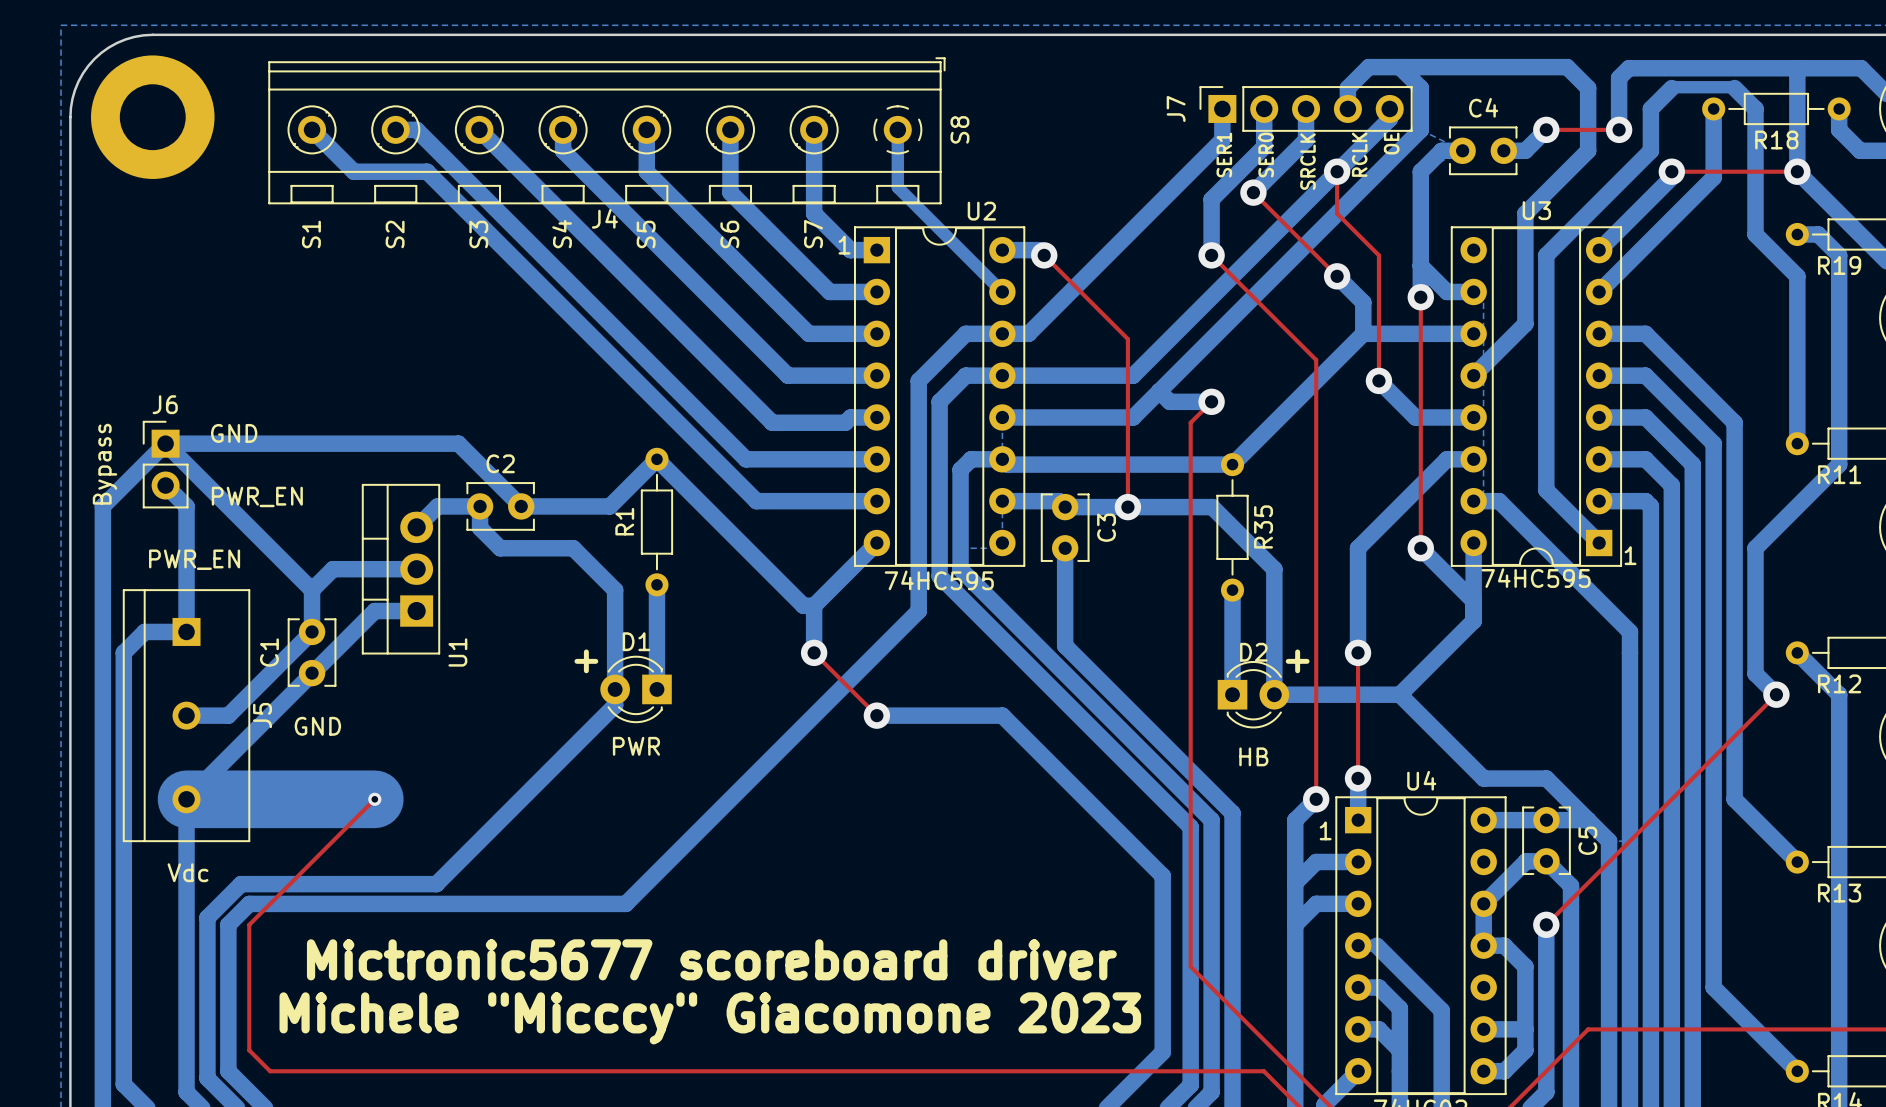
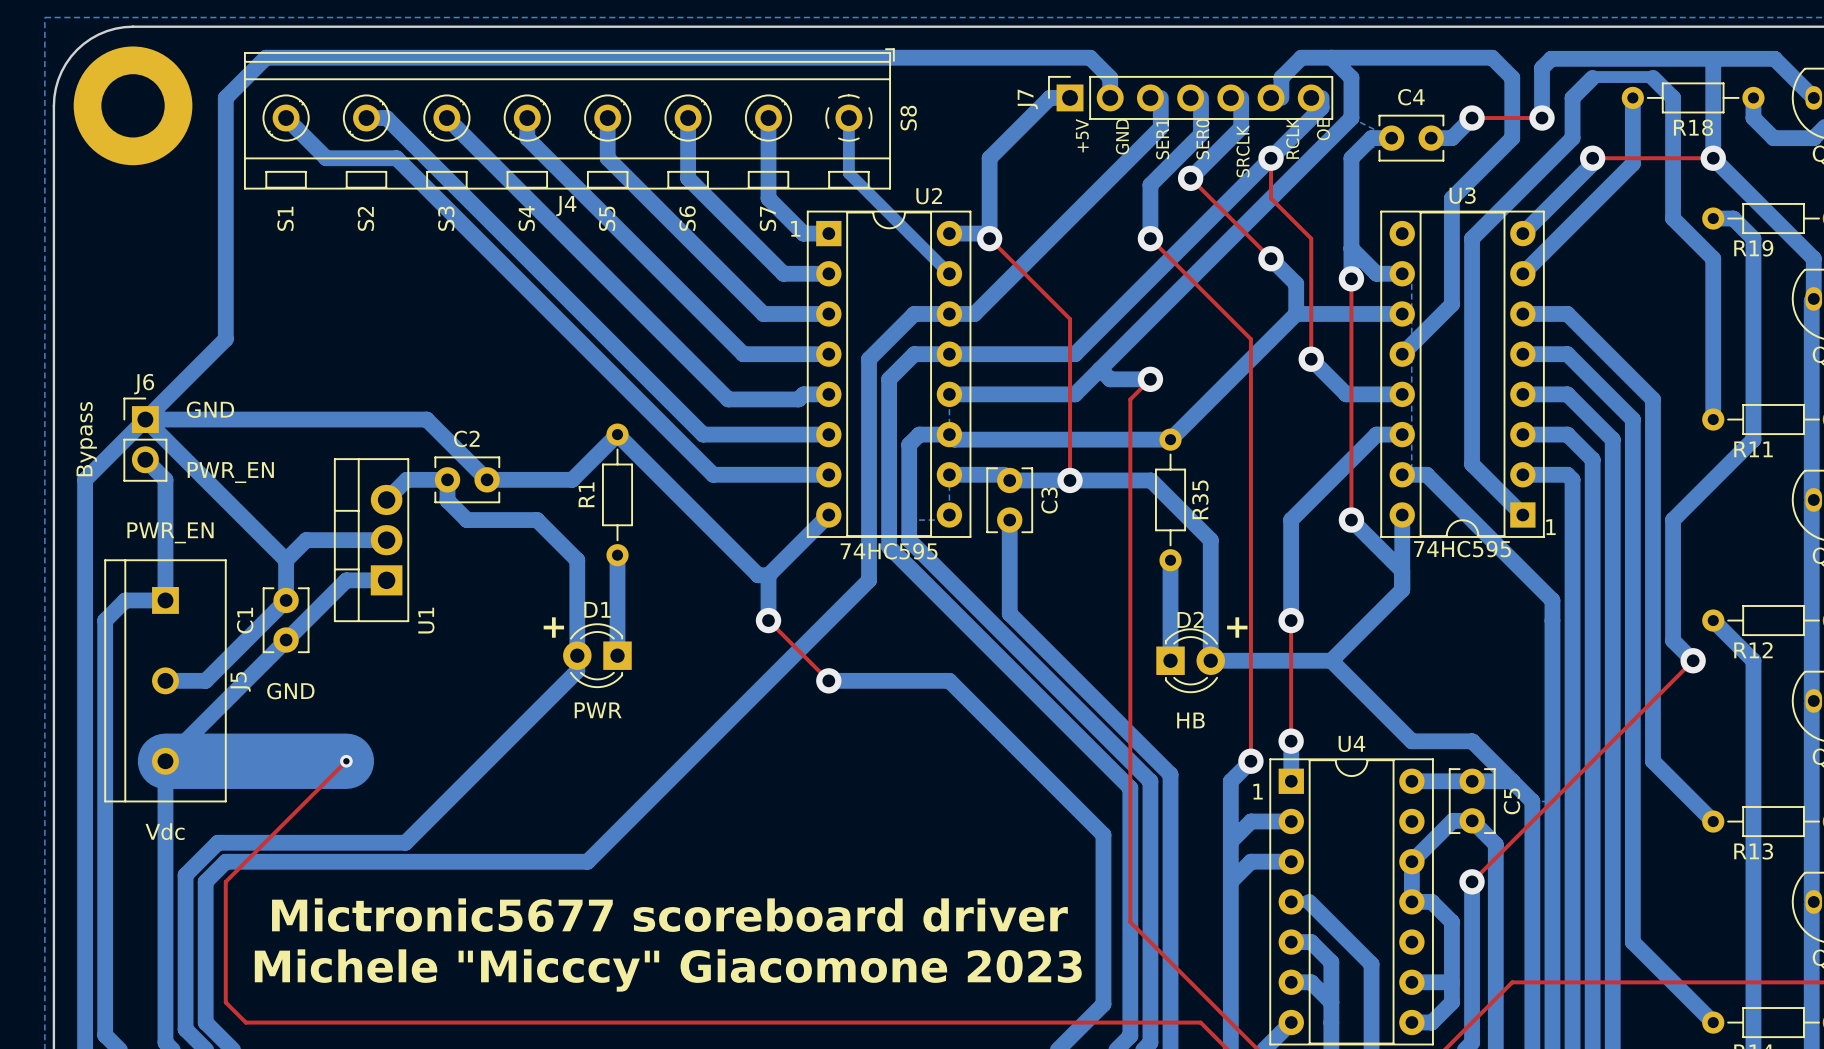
J7 footprint: [1199, 86, 1413, 132] -> [1048, 75, 1334, 120]
bottom track: none -> (1070, 97) (1049, 97) (989, 158) (989, 238)
bottom track: none -> (1110, 97) (1110, 77) (1090, 57) (265, 57) (225, 97) (225, 339) (145, 419)
J7 name position: J7 (1176, 108) -> J7 (1027, 99)
text: none -> +5V (1082, 135)
text: none -> GND (1122, 136)

